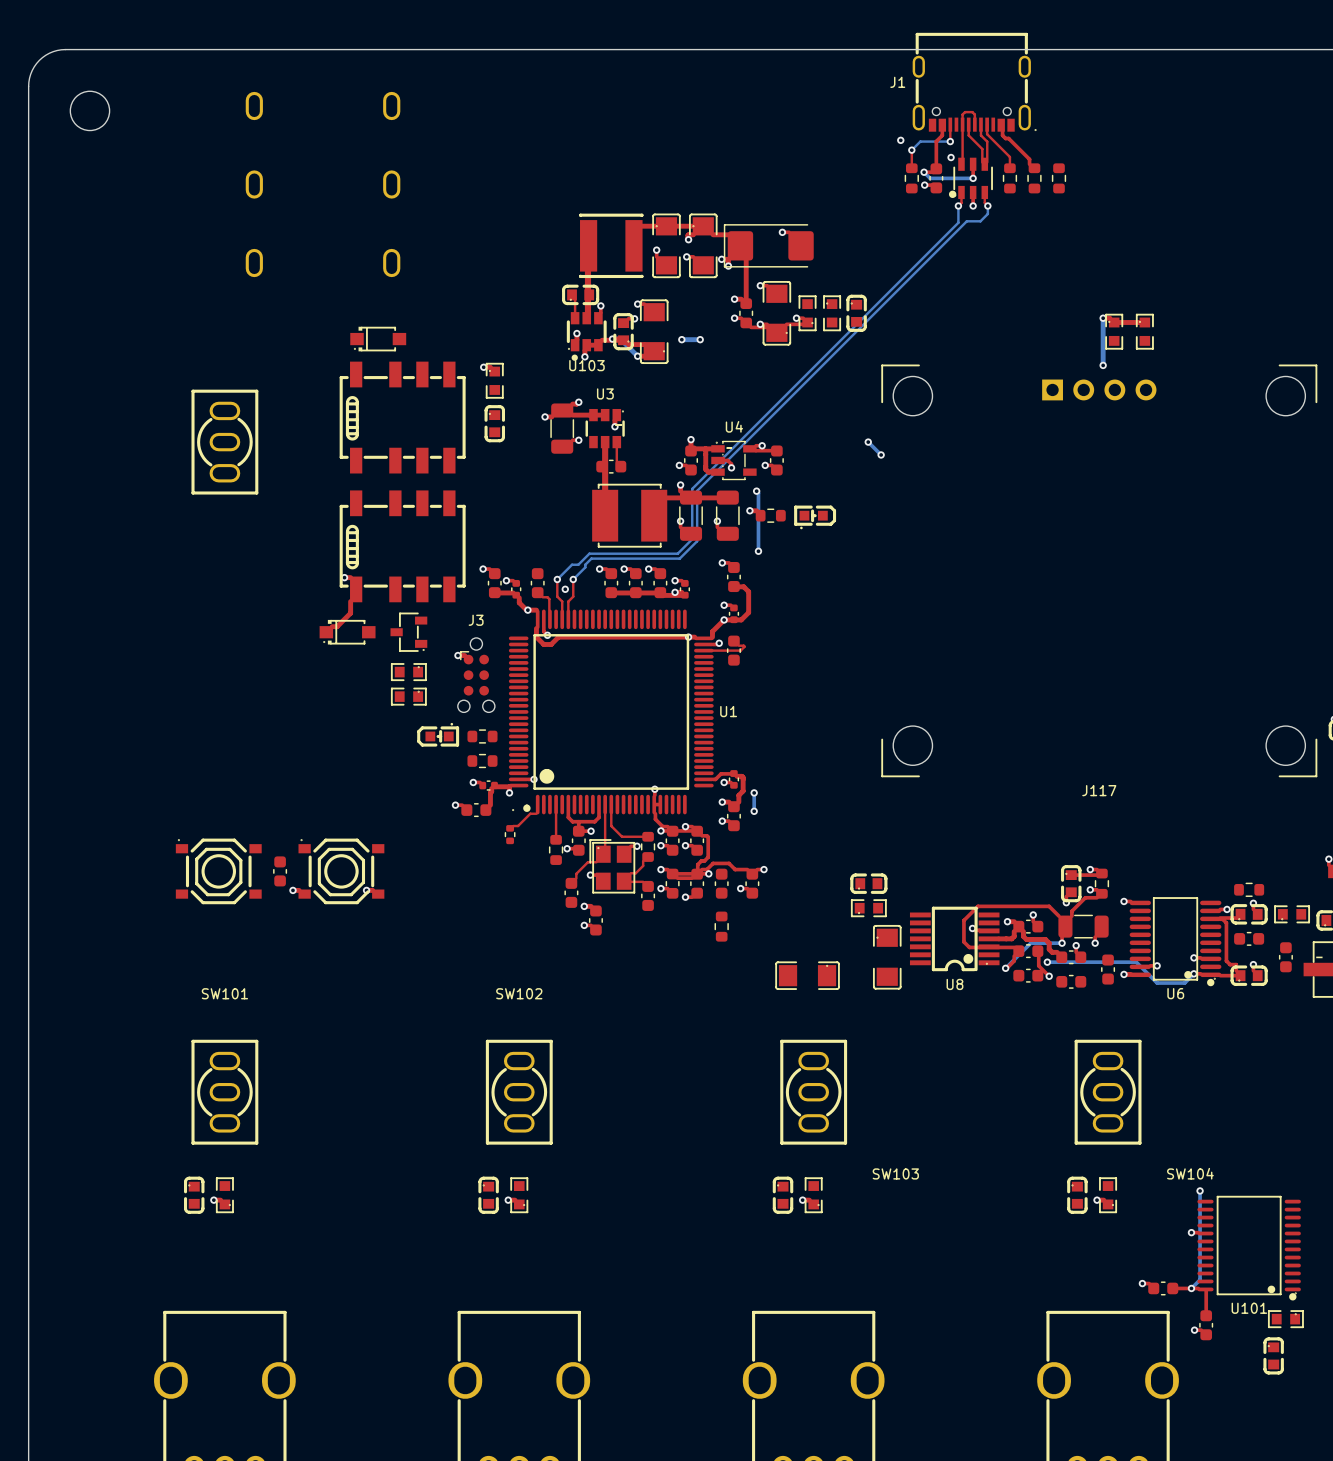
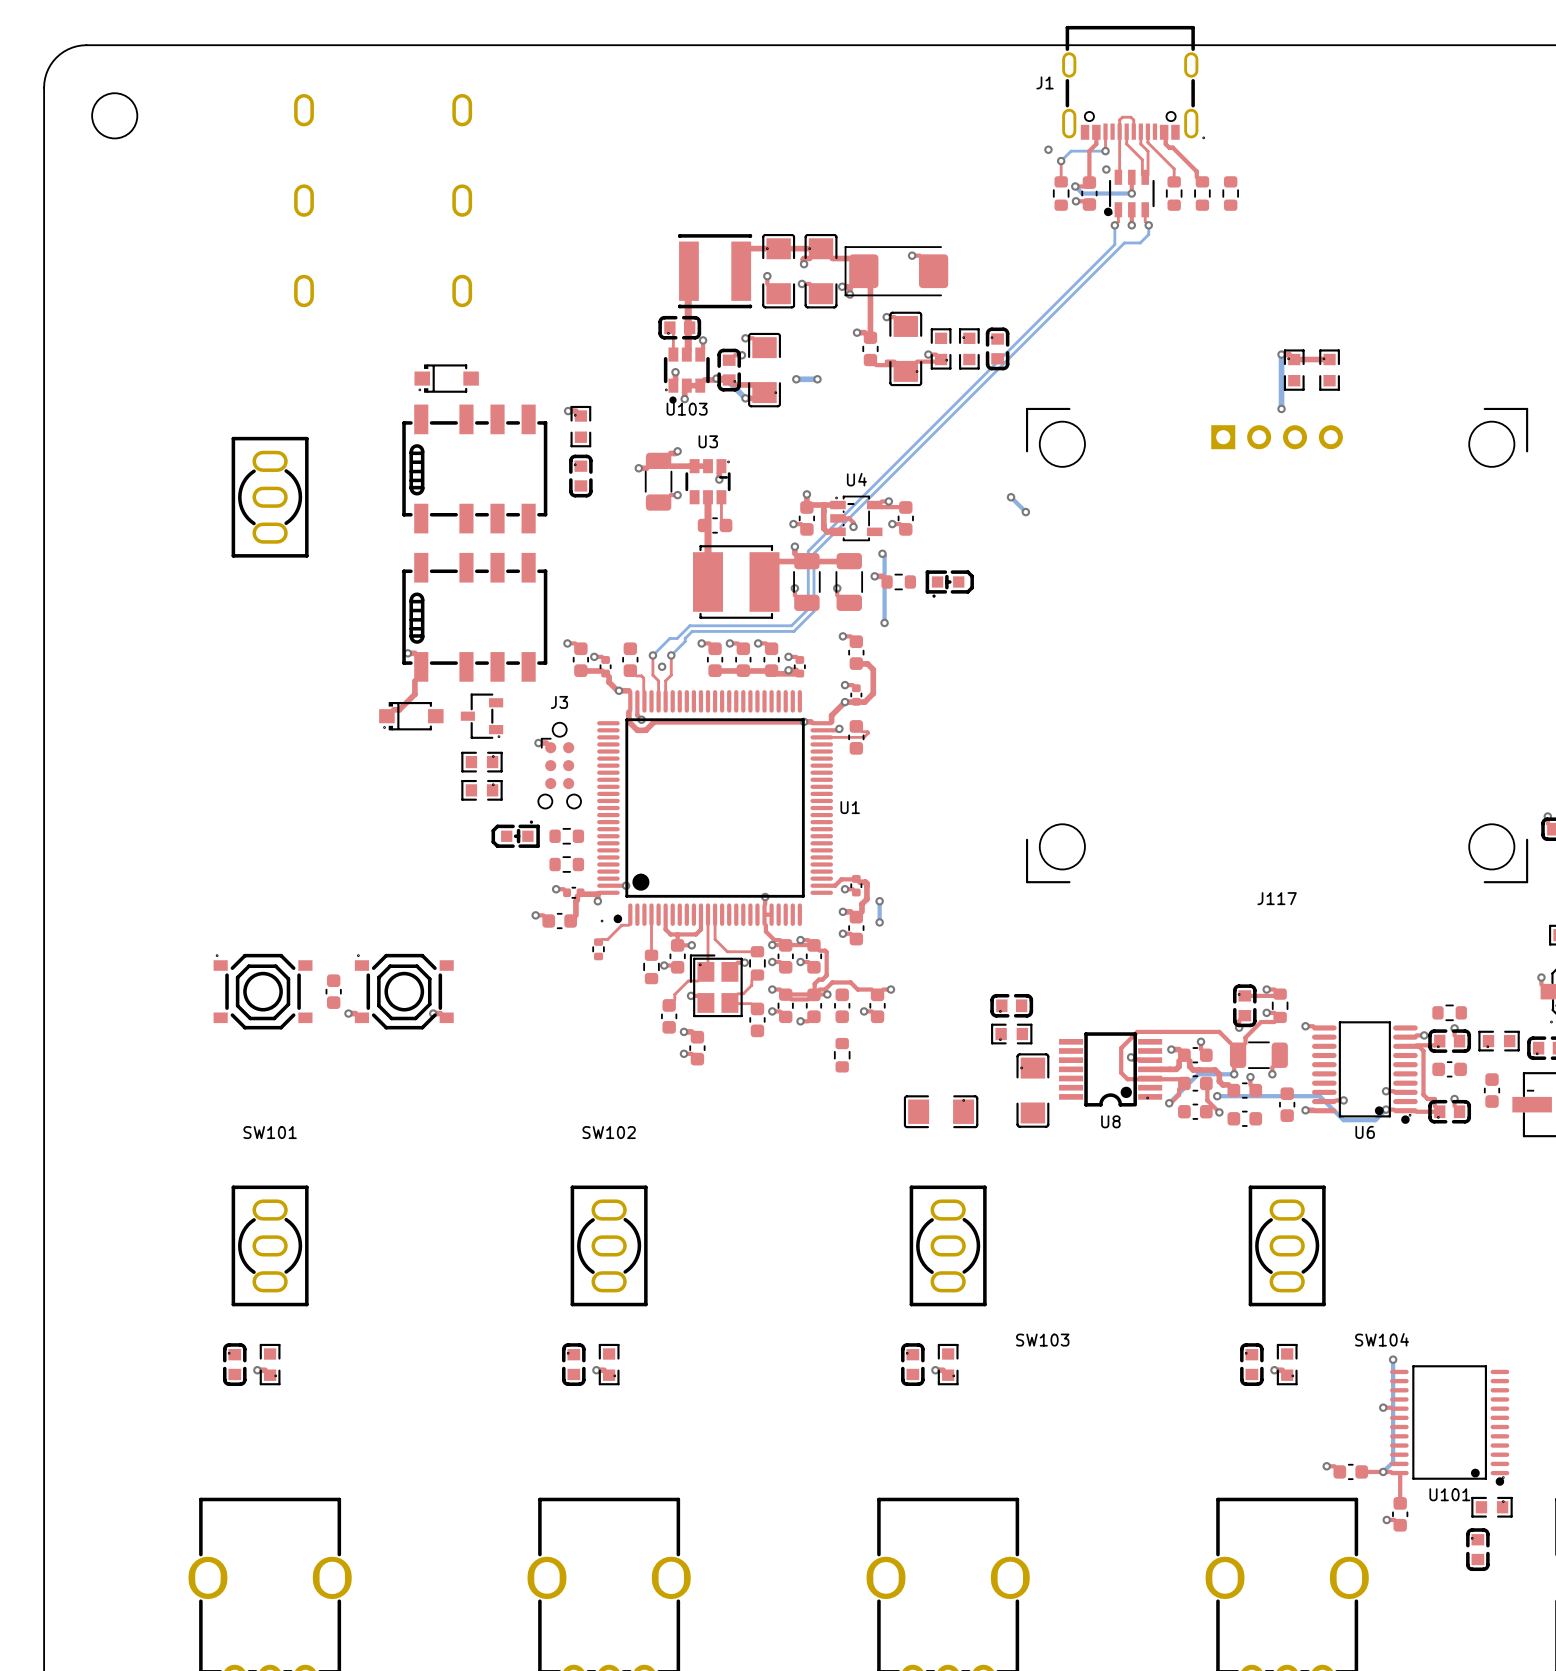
top track: (734, 318) (741, 318) -> none
via: (734, 318) -> none
via: (760, 324) -> none

